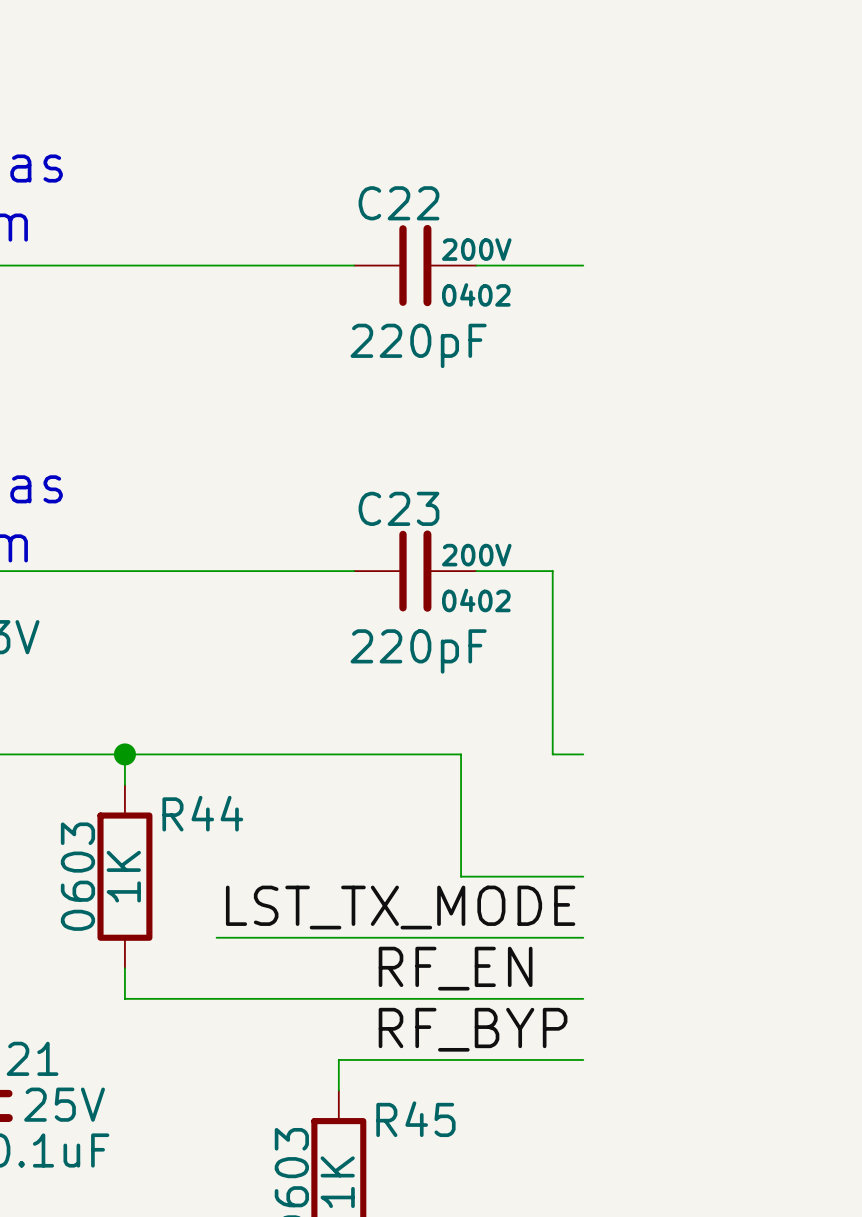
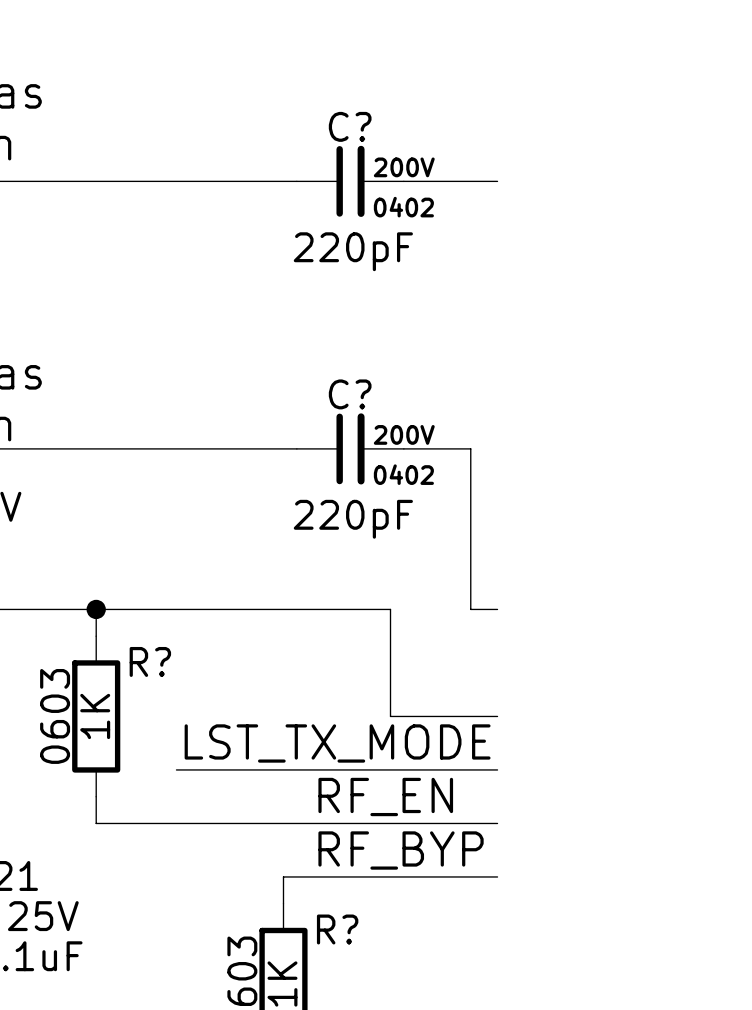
C22 name: C22 (398, 203) -> C? (350, 126)
C23 name: C23 (398, 508) -> C? (350, 394)
R44 name: R44 (202, 813) -> R? (150, 661)
R45 name: R45 (415, 1119) -> R? (337, 929)

